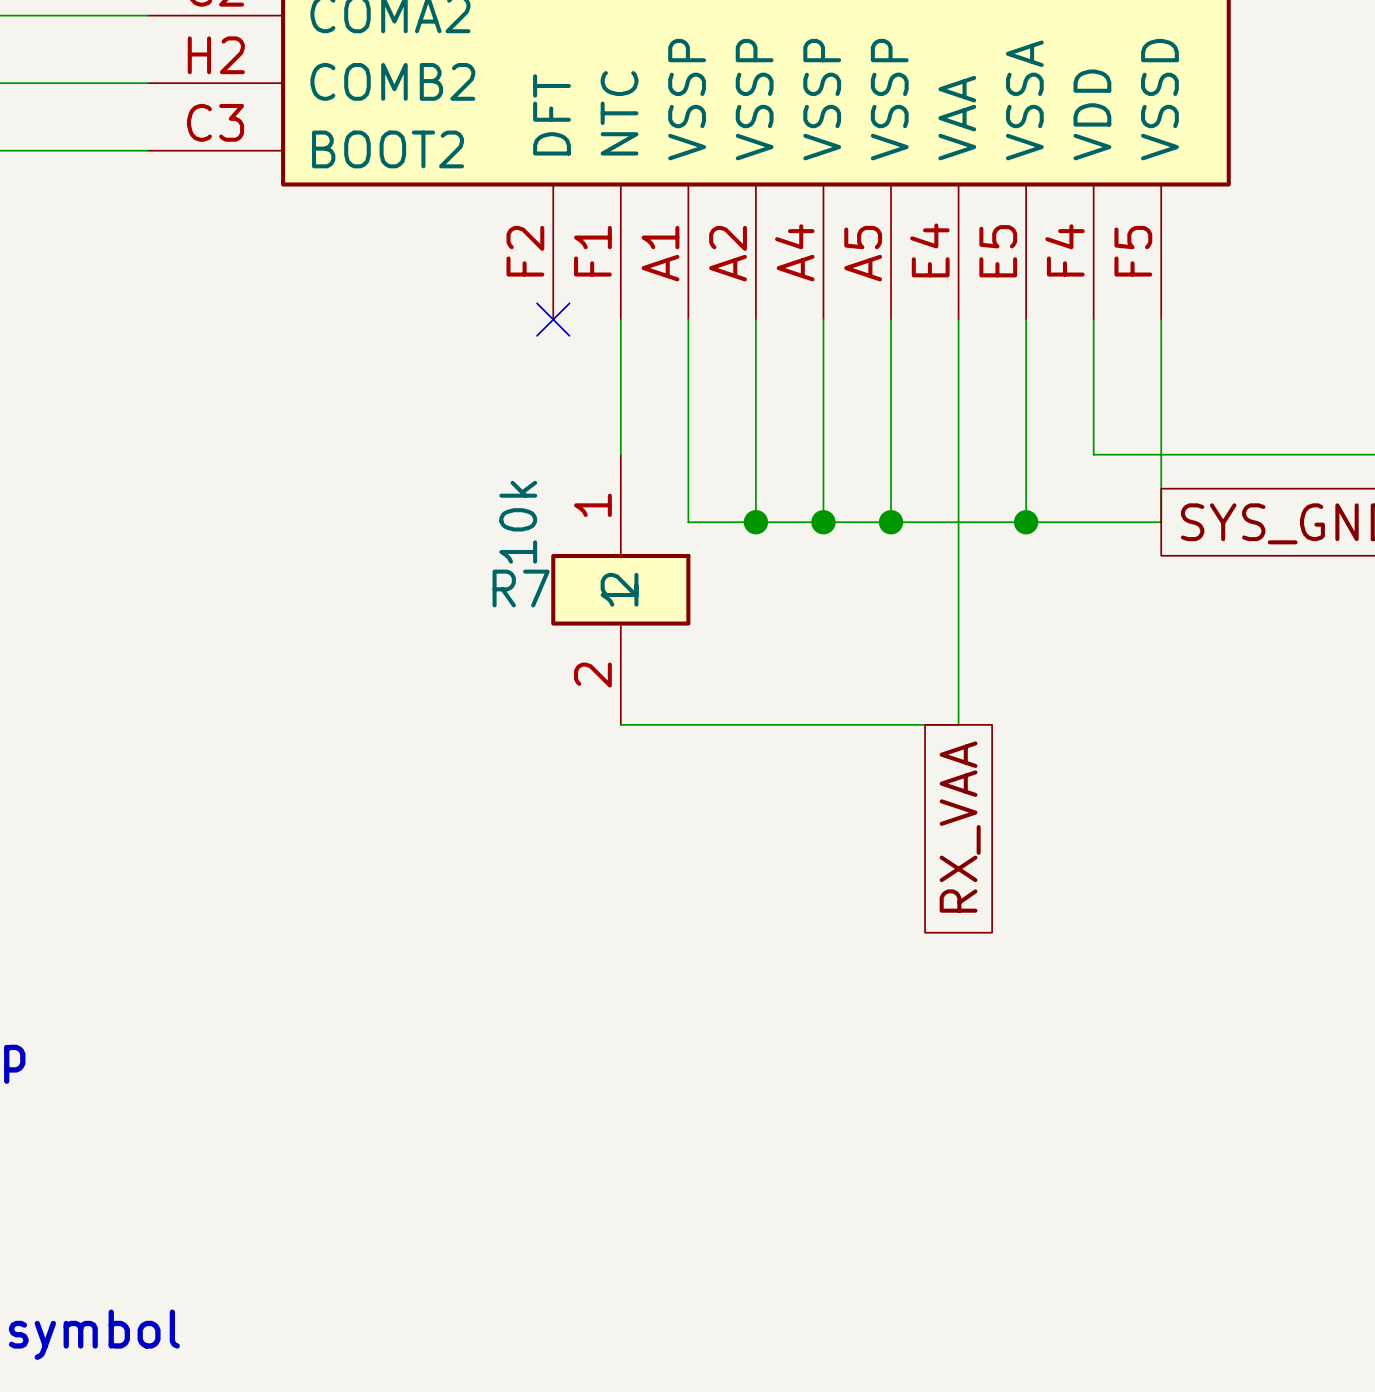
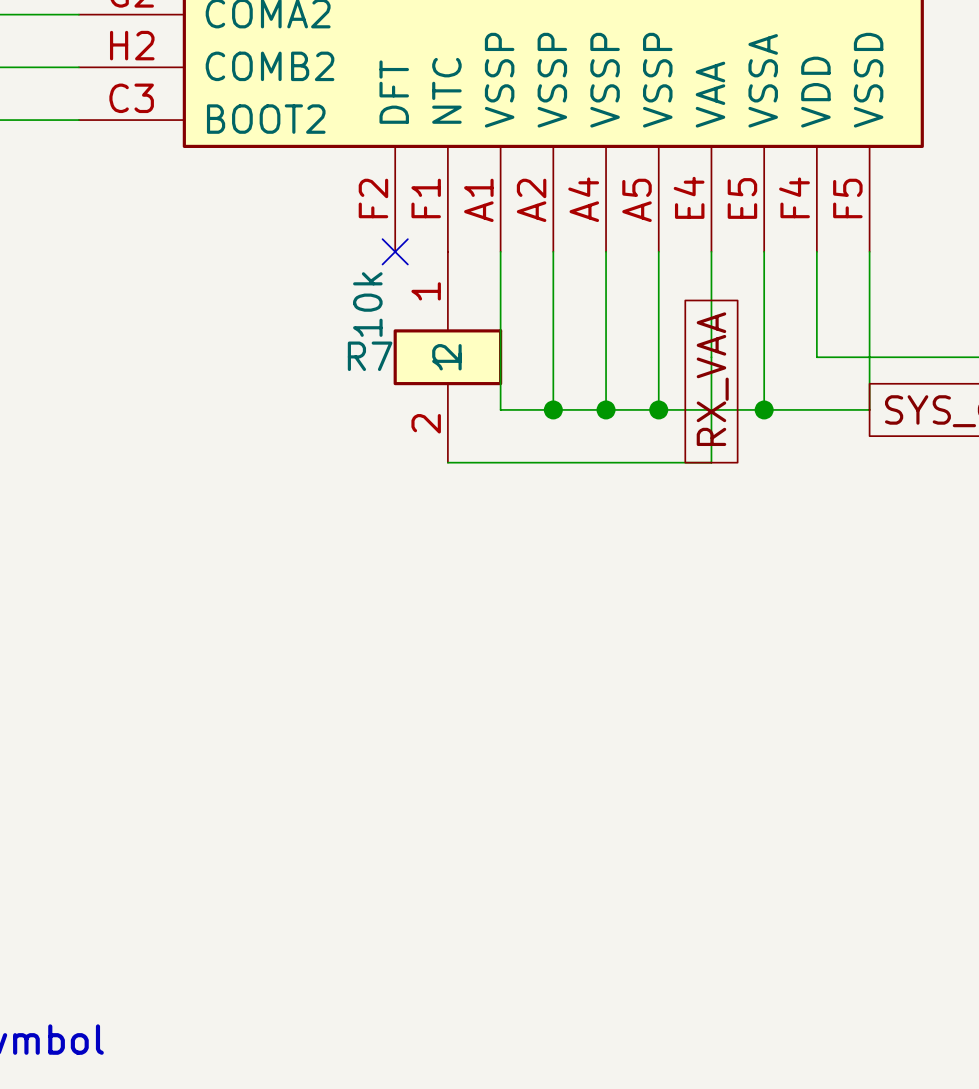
R7 position: (620, 589) -> (447, 357)
wire: (958, 589) (958, 724) (620, 724) -> (711, 462) (447, 462)
global label rotation: 0° (960, 827) -> 180° (712, 379)
global label position: RX_VAA (960, 827) -> RX_VAA (712, 379)

